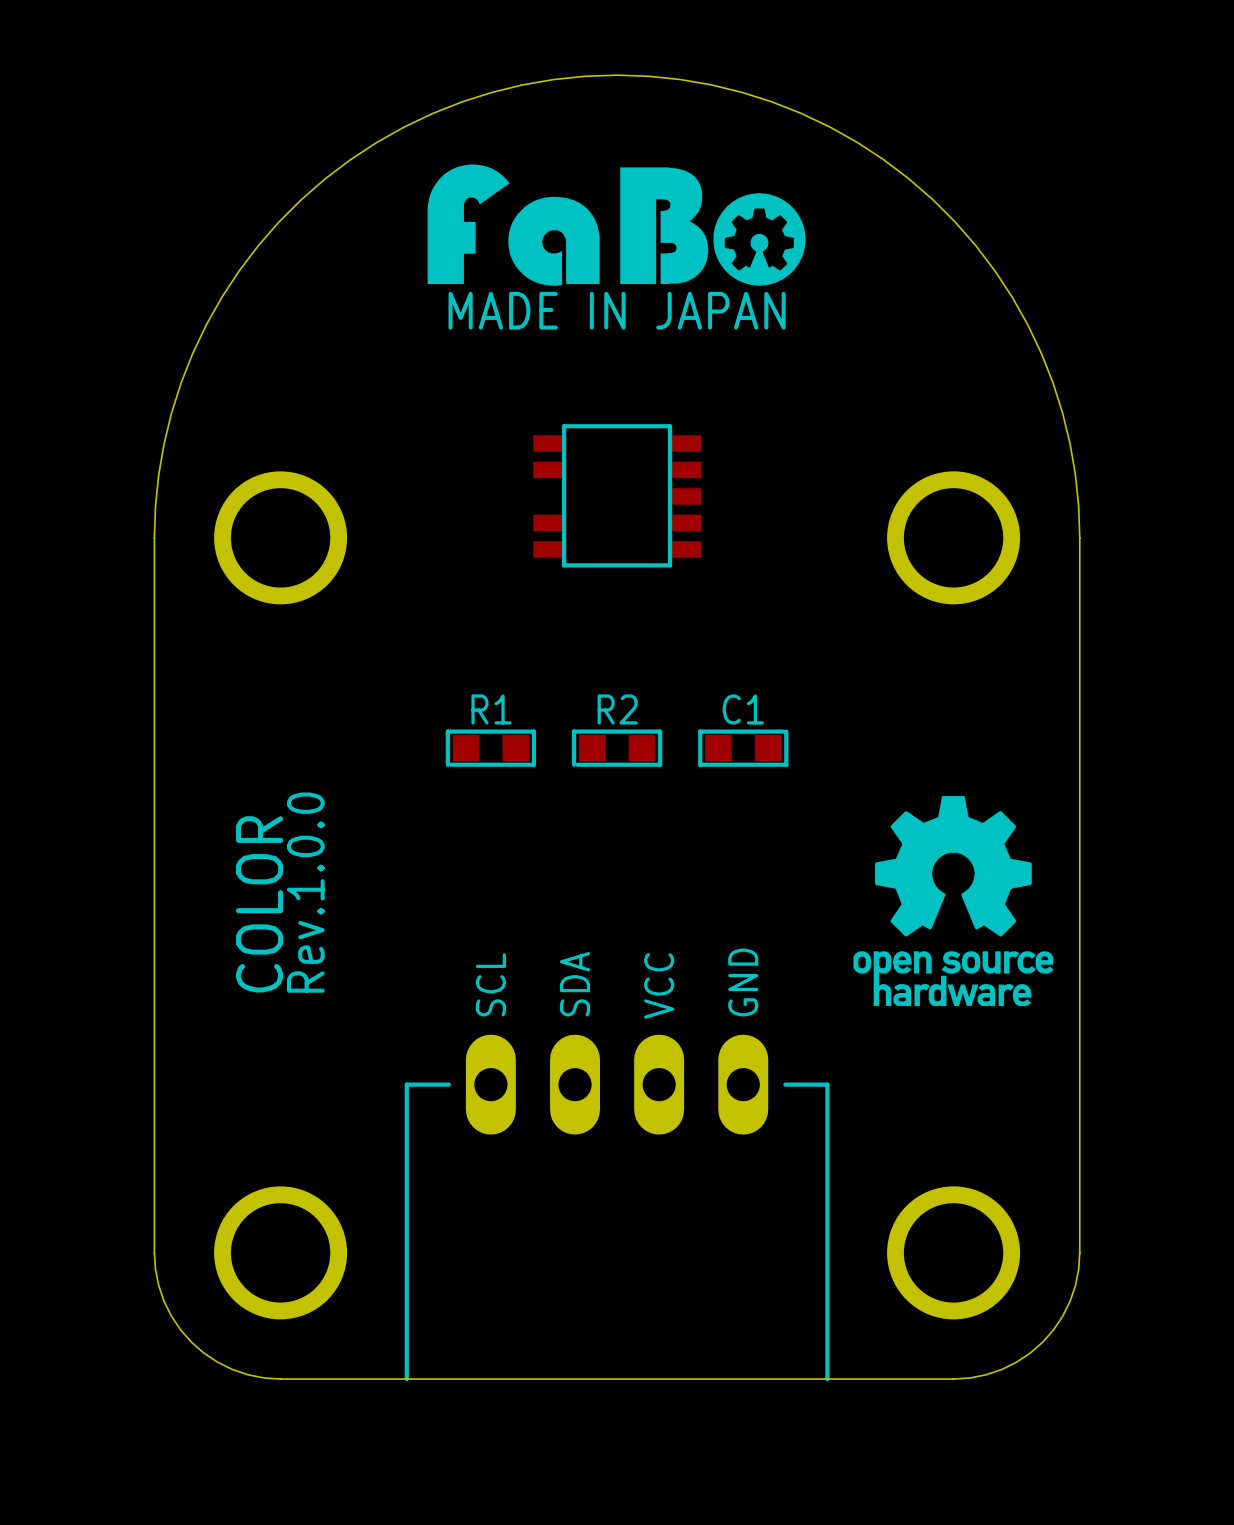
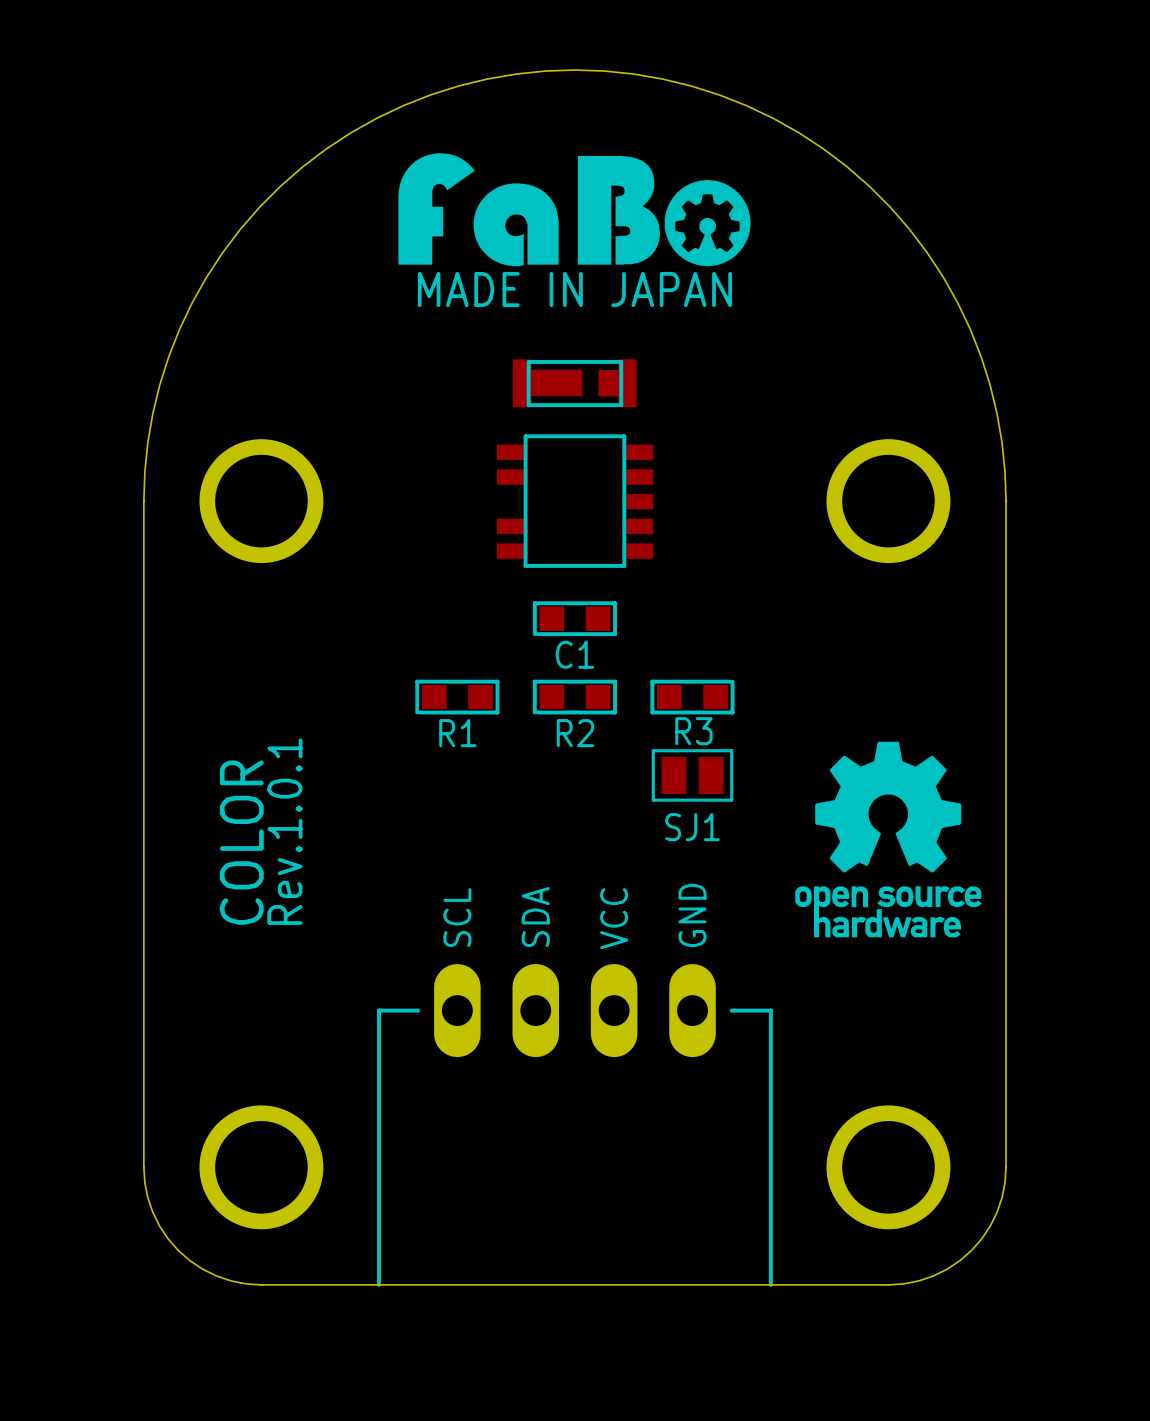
part: none -> (574, 383)
part position: (617, 495) -> (575, 501)
C1: none -> (574, 618)
R1 name position: R1 (491, 709) -> R1 (457, 733)
R2 name position: R2 (617, 709) -> R2 (575, 733)
C1 name: C1 (743, 709) -> R3 (693, 731)
SJ1: none -> (692, 775)
text: Rev.1.0.0 (305, 892) -> Rev.1.0.1 (284, 831)

